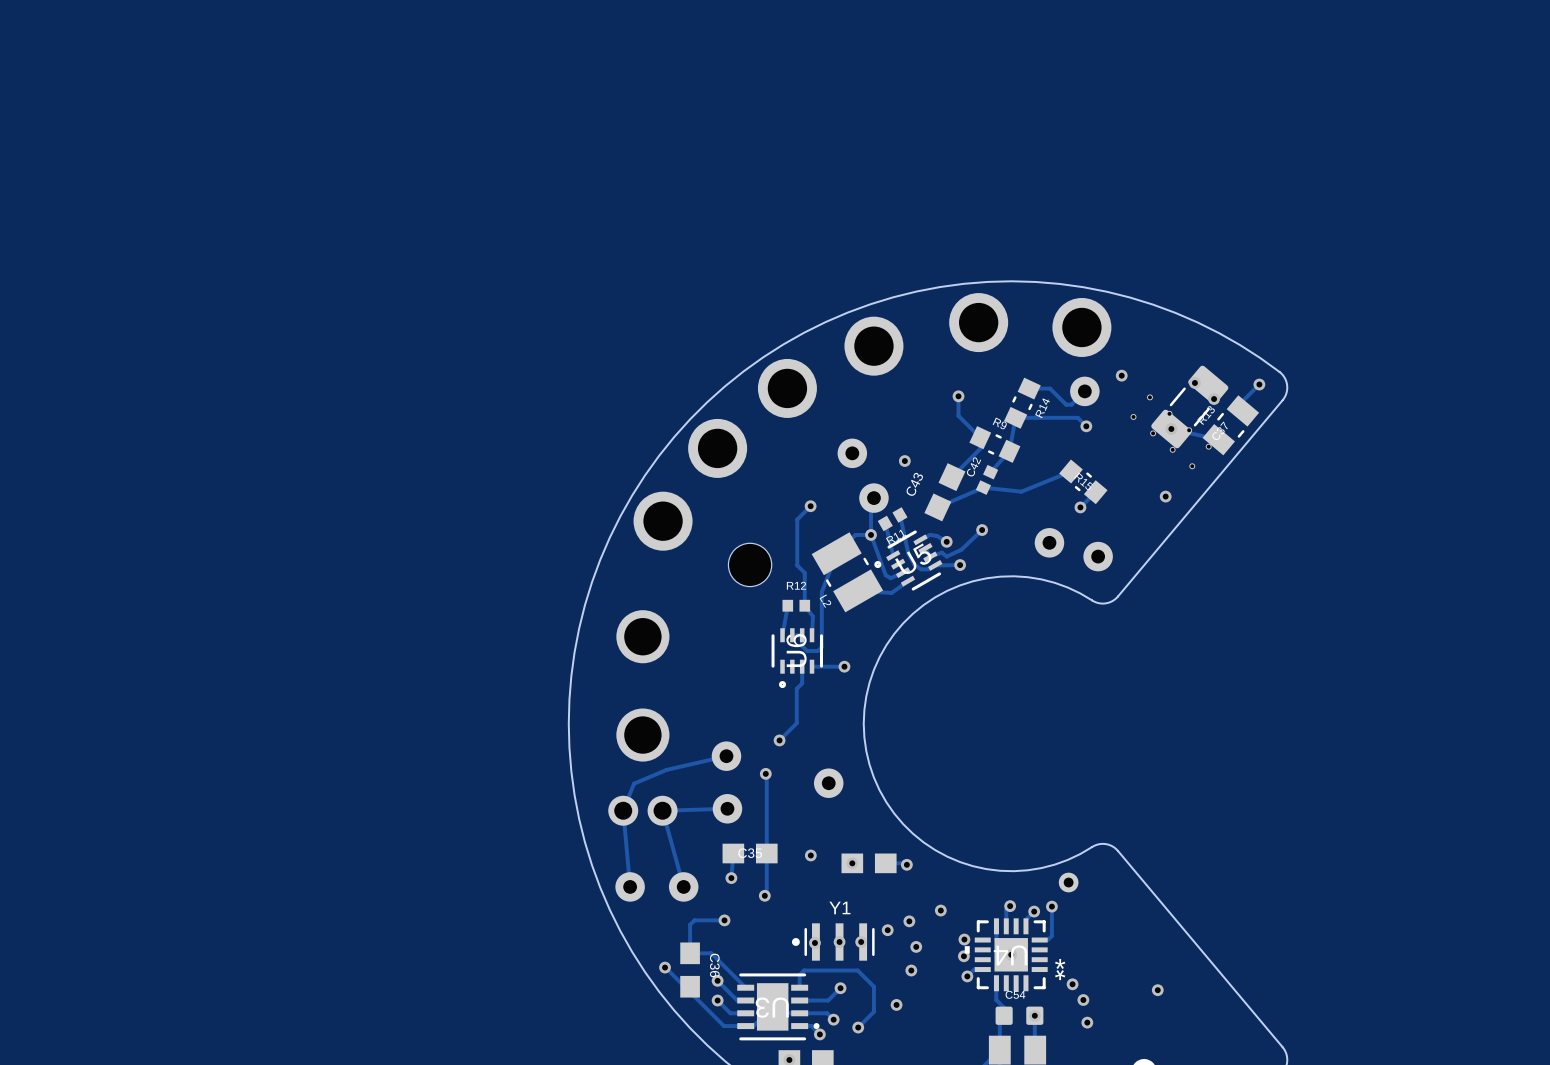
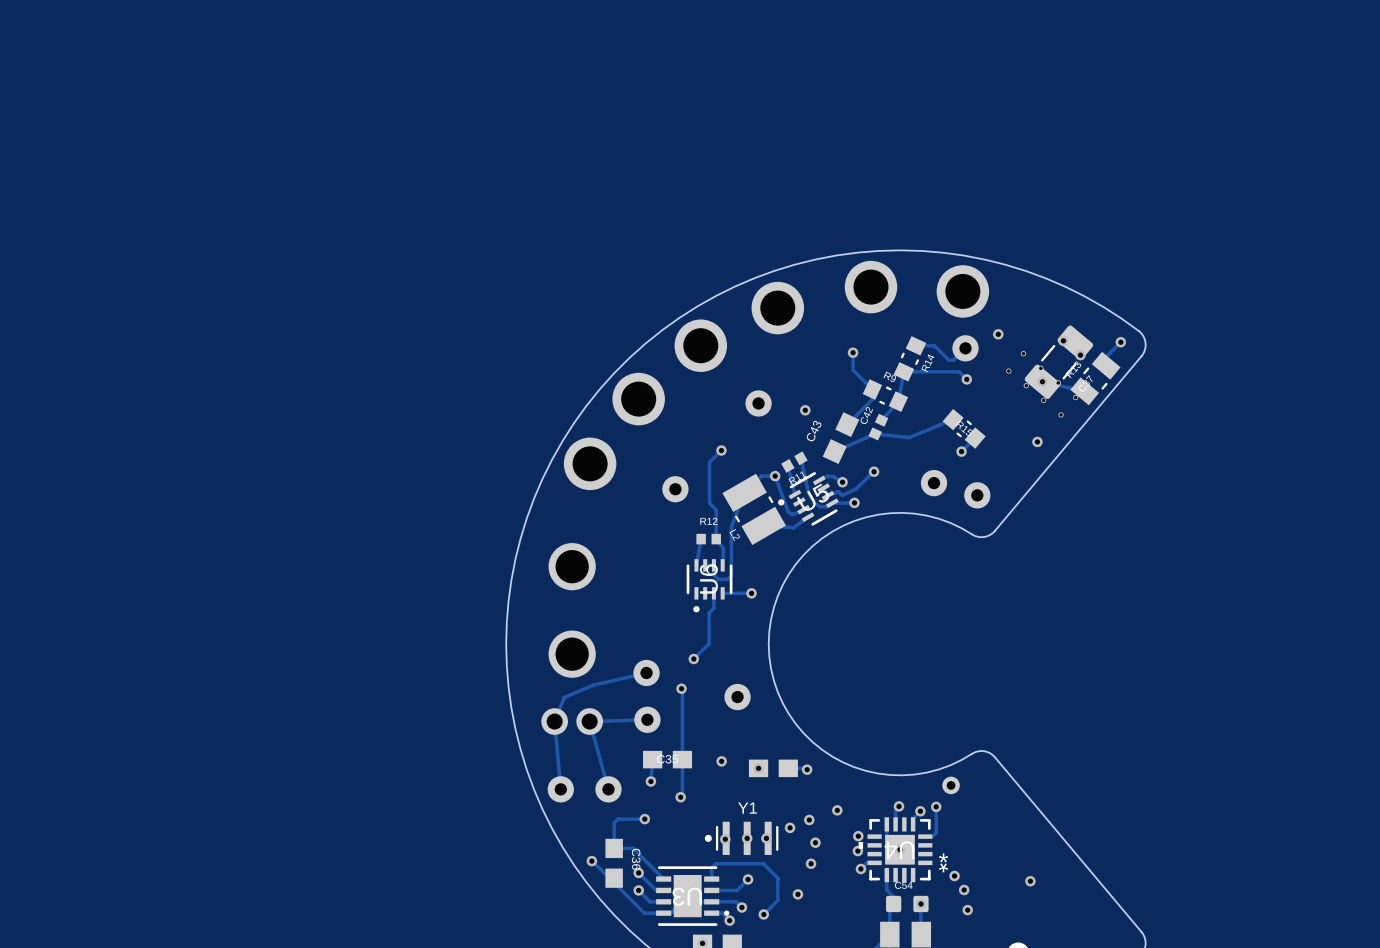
track: (873, 498) (871, 501) (871, 534) -> none
part: (873, 498) -> none
part footprint: [728, 543, 772, 587] -> [662, 476, 689, 503]

